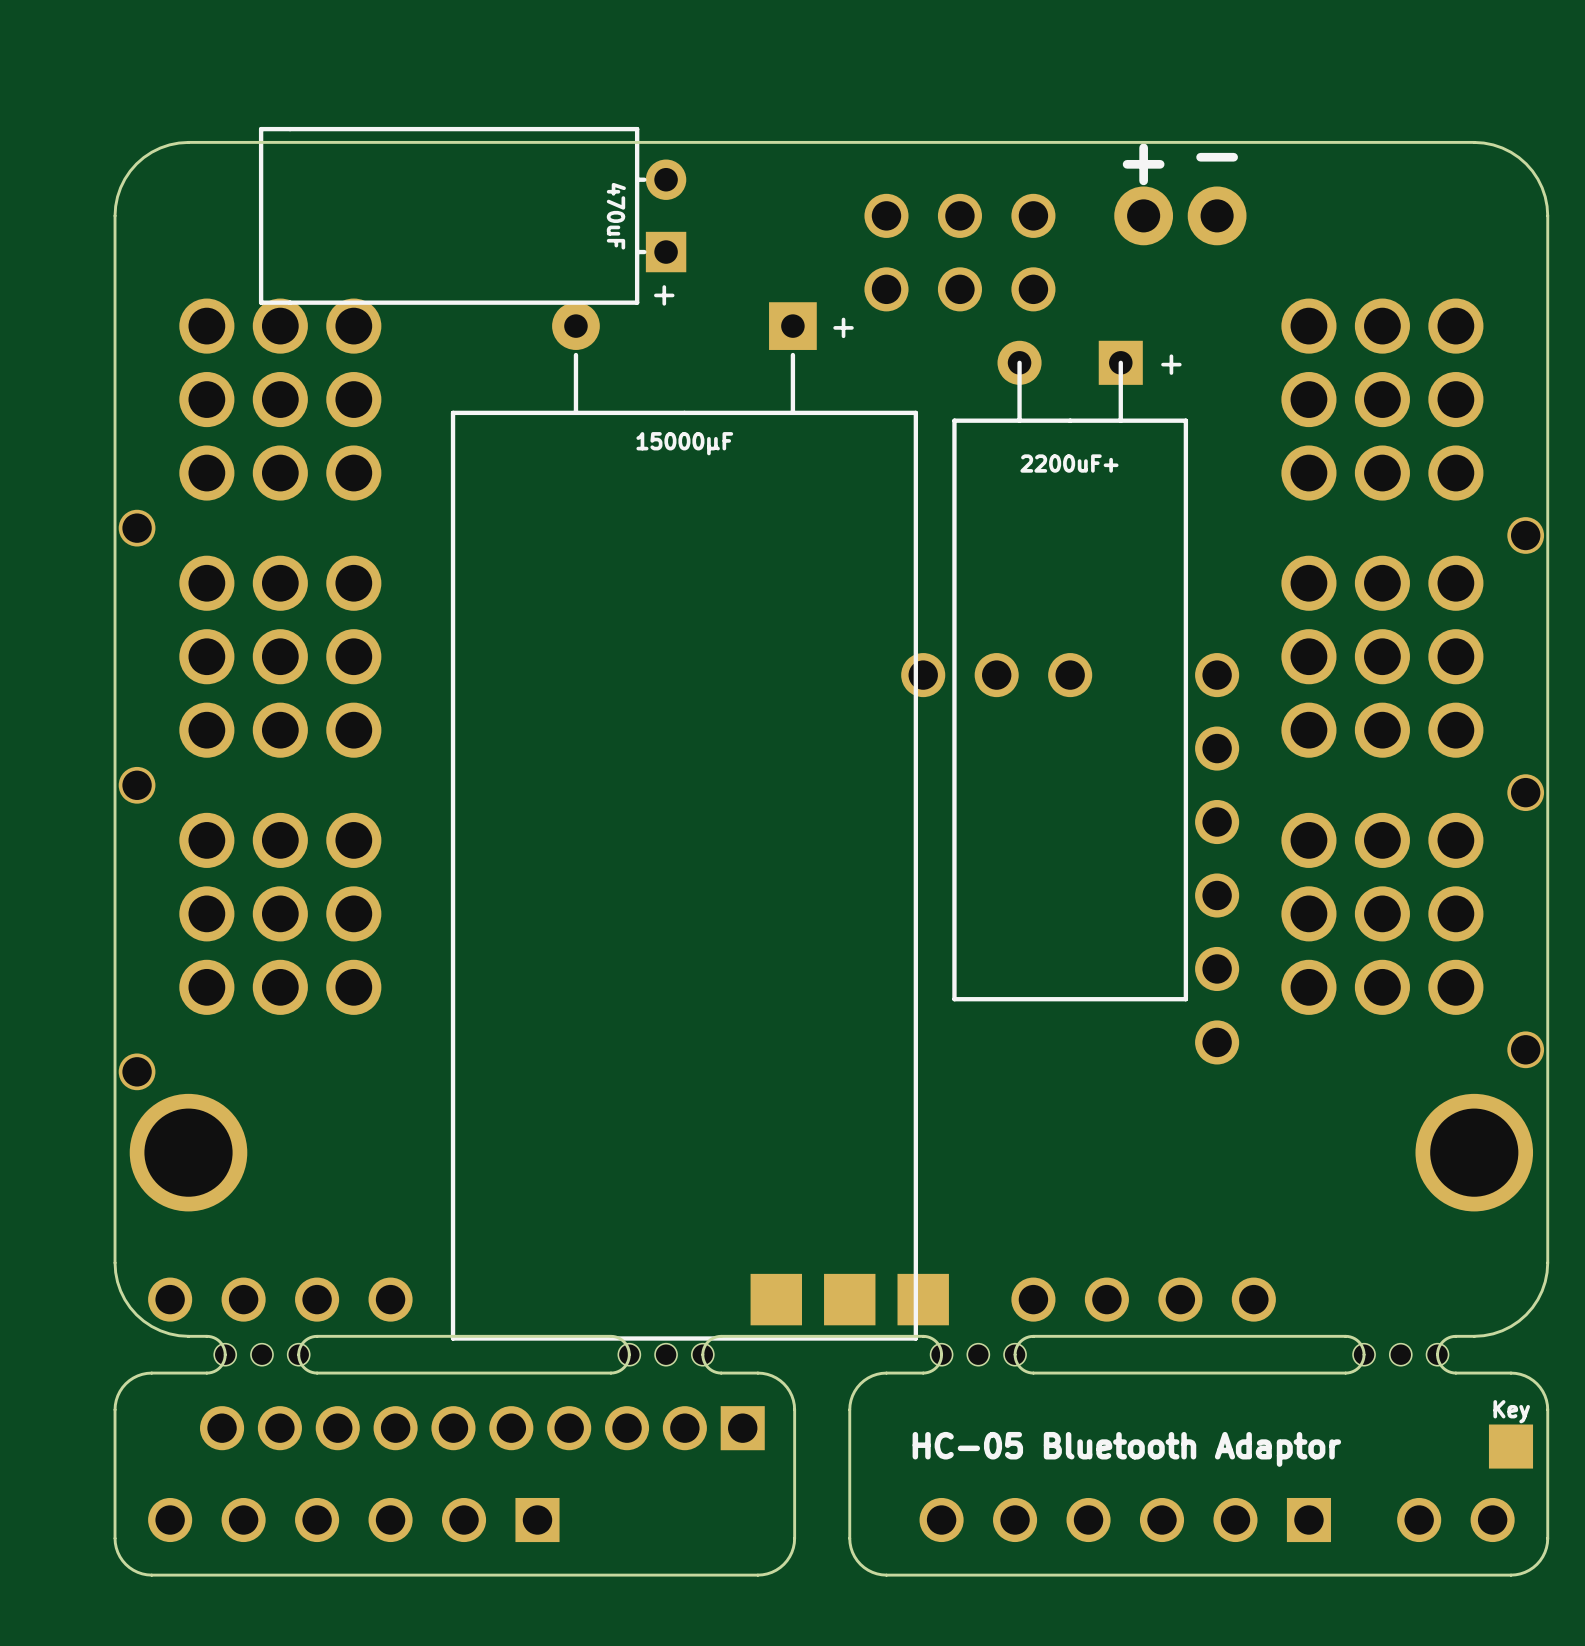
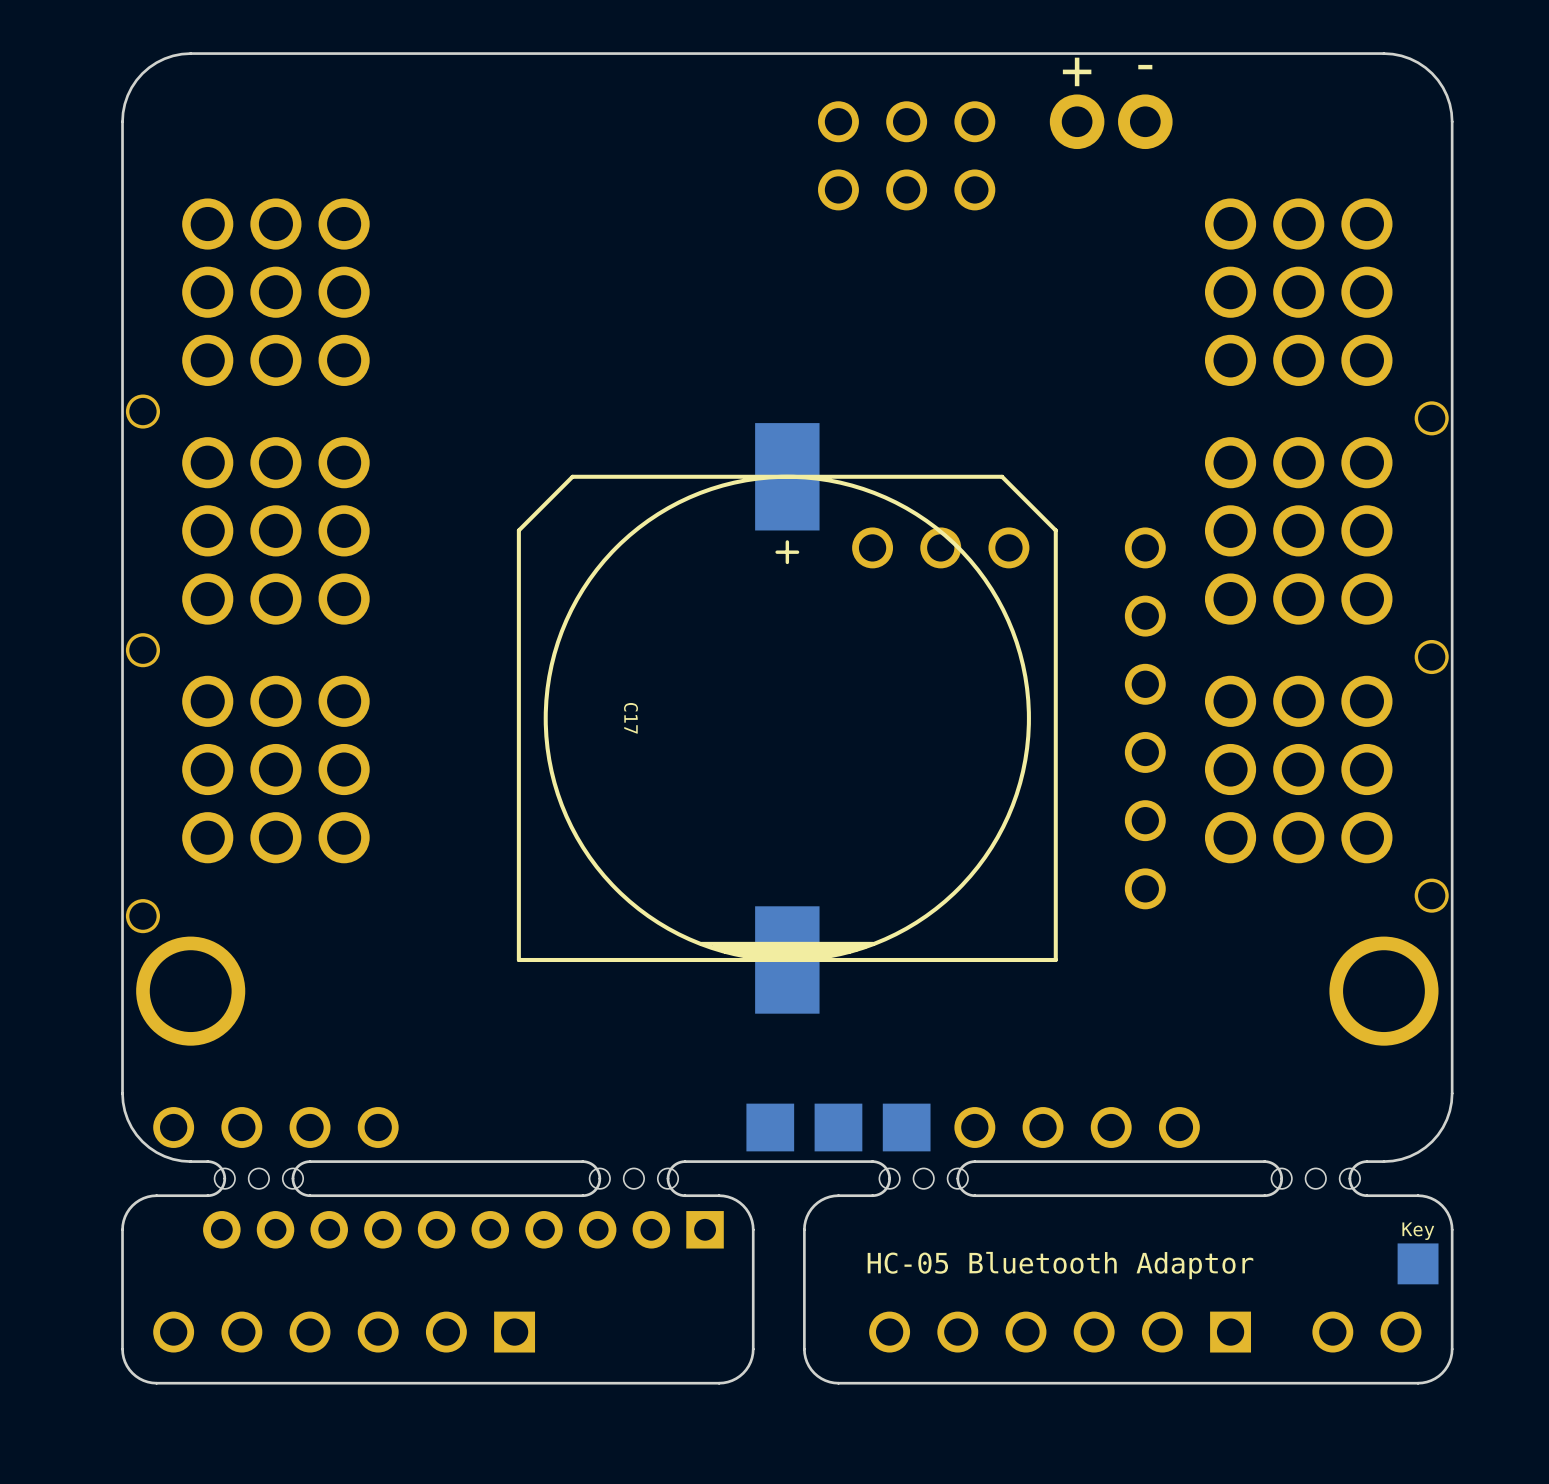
part: 470uF (472, 215) -> none
part: 2200uF+ (1070, 671) -> none
part: 15000µF (684, 821) -> none
C17: none -> (787, 718)
part position: (849, 1299) -> (838, 1127)
part footprint: [200, 1406, 765, 1451] -> [203, 1211, 724, 1249]

